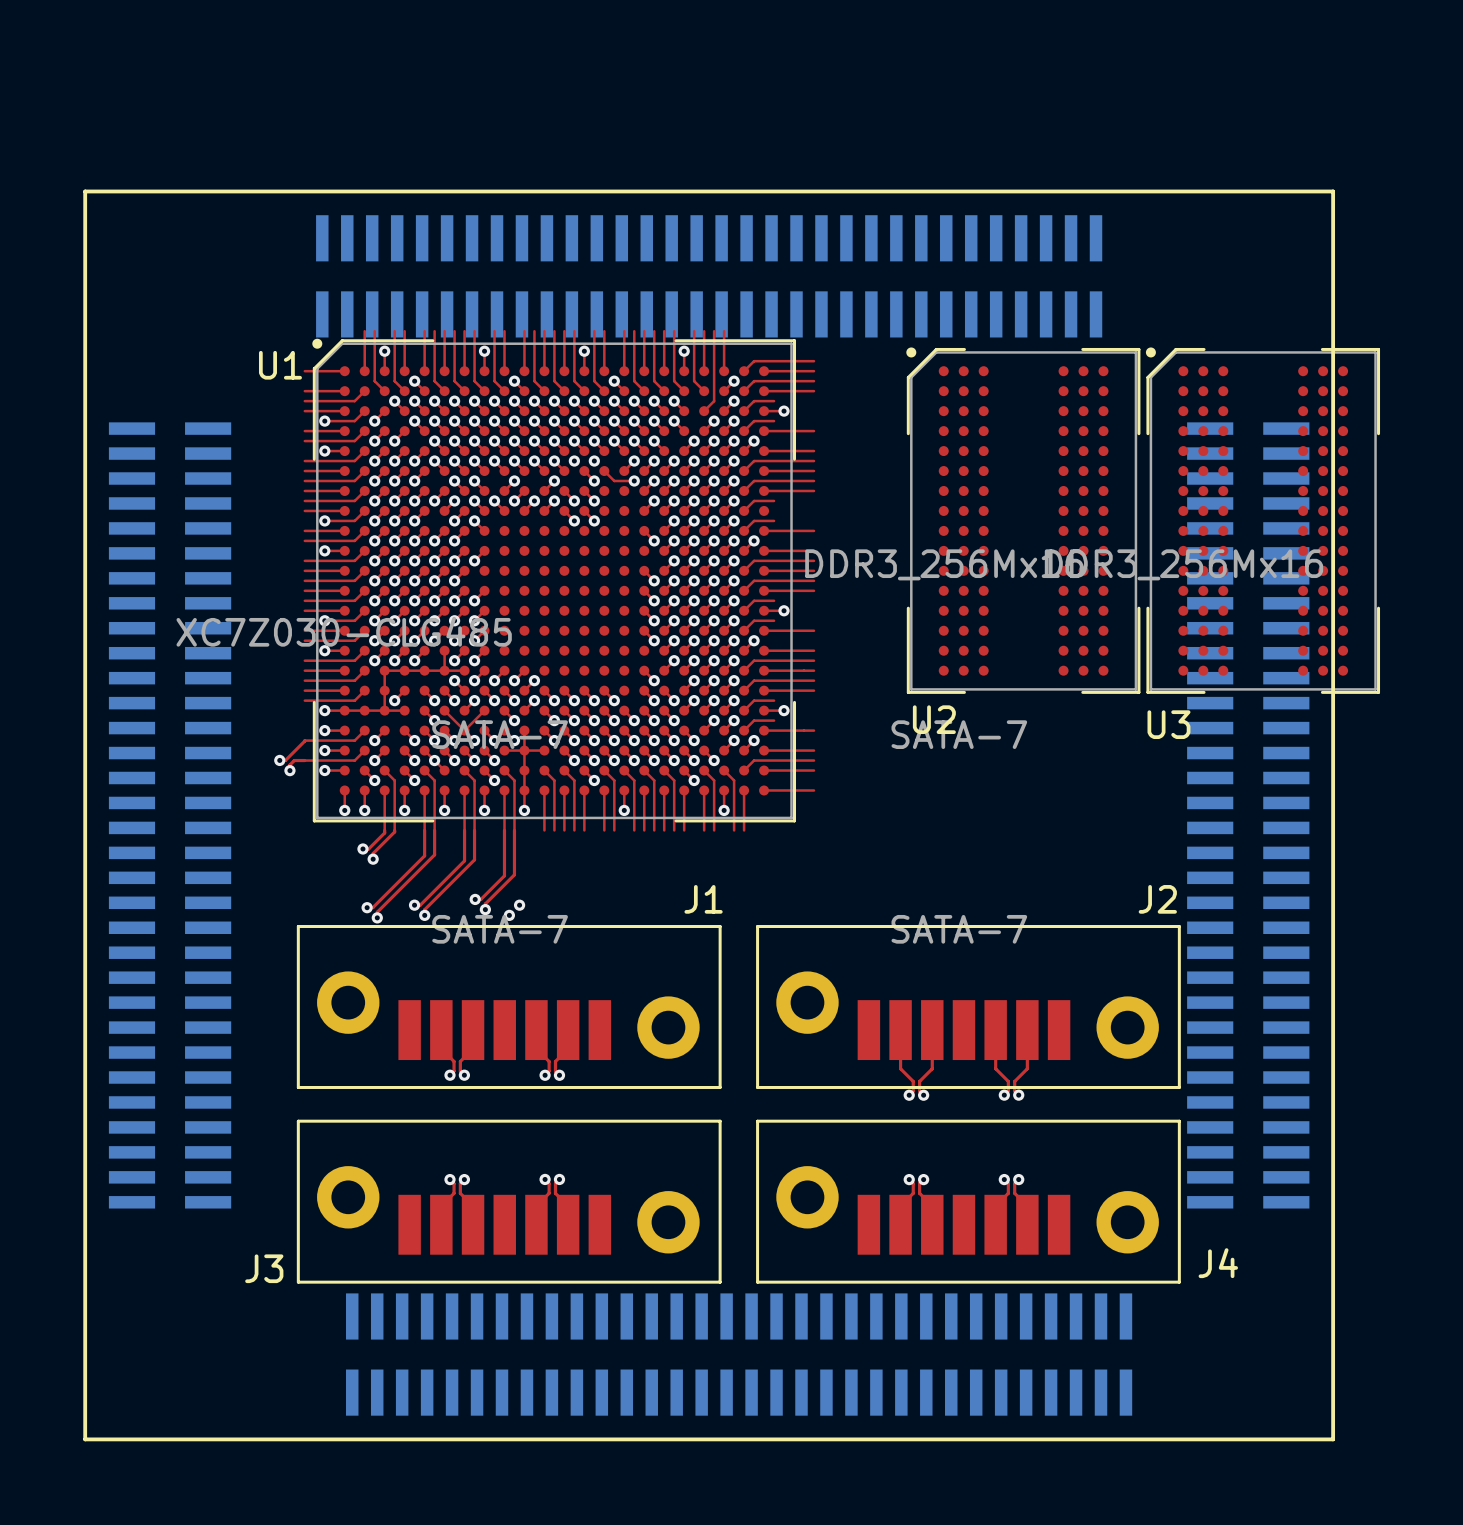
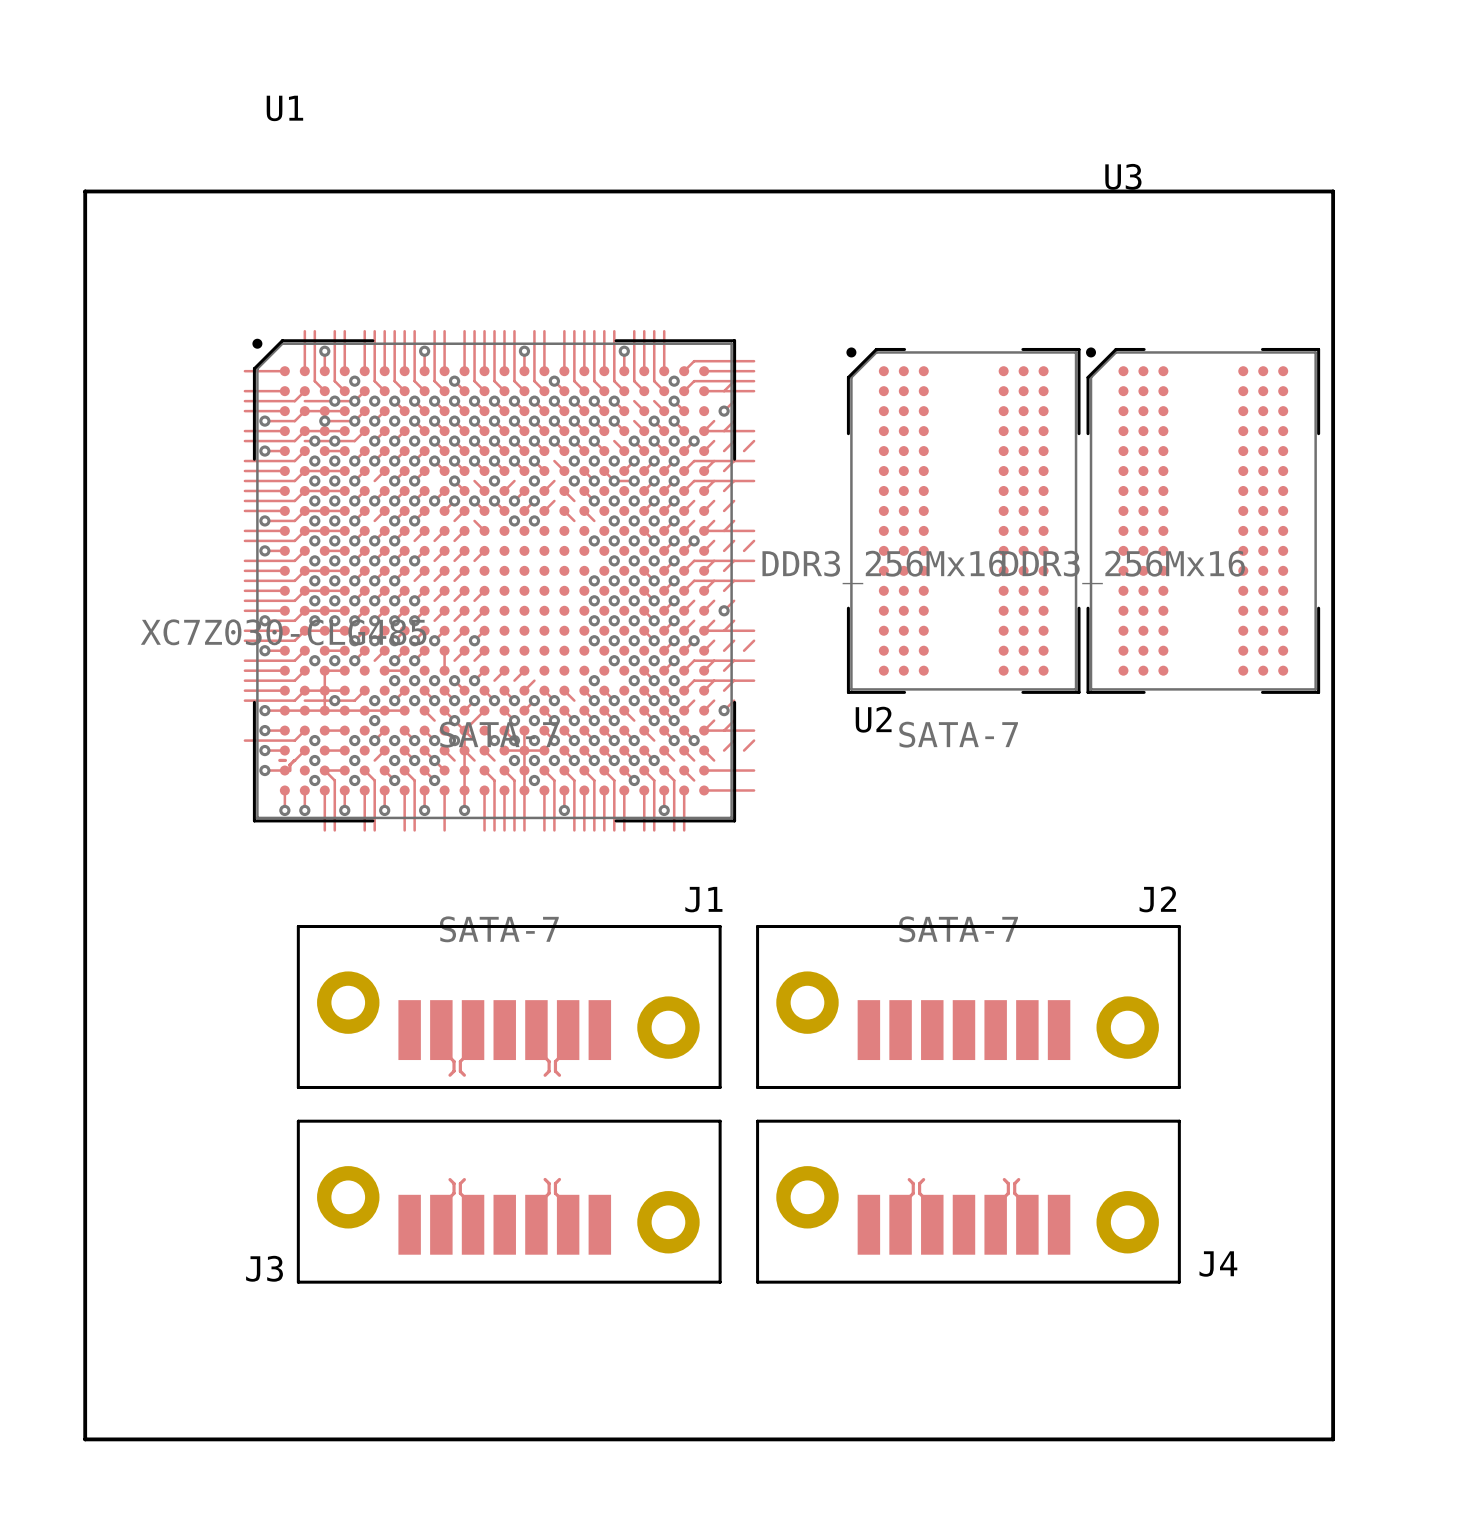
part: (709, 276) -> none
top track: none -> (314, 331) (314, 381) (324, 391)
top track: (424, 331) (424, 351) -> (384, 331) (384, 351)
top track: (454, 331) (454, 381) -> (414, 331) (414, 381)
top track: (524, 331) (524, 351) -> (484, 331) (484, 351)
top track: (554, 331) (554, 381) -> (514, 331) (514, 381)
top track: none -> (614, 331) (614, 381)
top track: (624, 331) (624, 351) -> (584, 331) (584, 351)
top track: (674, 331) (674, 381) (684, 391) -> (754, 381) (694, 381) (684, 391)
top track: (694, 331) (694, 381) (704, 391) -> (754, 391) (704, 391)
top track: (704, 331) (704, 371) -> (754, 371) (704, 371)
top track: (714, 331) (714, 401) (704, 411) -> none
top track: (724, 331) (724, 371) -> (344, 331) (344, 371)
top track: none -> (324, 351) (324, 371)
via: none -> (324, 351)
via: (384, 351) -> none
via: none -> (424, 351)
via: (484, 351) -> none
via: none -> (524, 351)
via: (584, 351) -> none
via: none -> (624, 351)
top track: (684, 351) (684, 371) -> (754, 361) (694, 361) (684, 371)
via: (684, 351) -> none
top track: (813, 361) (754, 361) (744, 371) -> none
U1 name position: U1 (280, 365) -> U1 (284, 108)
top track: none -> (244, 371) (284, 371)
top track: (304, 371) (344, 371) -> (304, 371) (304, 331)
top track: (764, 371) (813, 371) -> none
via: none -> (354, 381)
via: (414, 381) -> none
via: none -> (454, 381)
via: (514, 381) -> none
via: none -> (554, 381)
via: (614, 381) -> none
via: none -> (674, 381)
via: (734, 381) -> none
top track: (813, 381) (754, 381) (744, 391) -> none
top track: none -> (244, 391) (284, 391)
top track: (304, 391) (344, 391) -> (334, 331) (334, 381) (344, 391)
top track: none -> (304, 391) (294, 401) (244, 401)
top track: (764, 391) (813, 391) -> none
via: none -> (334, 401)
via: none -> (354, 401)
via: none -> (374, 401)
via: (634, 401) -> none
via: (654, 401) -> none
via: (734, 401) -> none
top track: (774, 401) (754, 401) (744, 411) -> none
top track: none -> (244, 411) (284, 411)
top track: none -> (304, 411) (294, 421) (264, 421)
via: none -> (724, 411)
top track: (764, 411) (784, 411) -> (264, 451) (284, 451)
via: (784, 411) -> none
via: none -> (264, 421)
via: none -> (354, 421)
via: none -> (394, 421)
via: (634, 421) -> none
via: (714, 421) -> none
via: (734, 421) -> none
top track: (774, 421) (754, 421) (744, 431) -> none
top track: none -> (244, 431) (284, 431)
top track: none -> (304, 431) (294, 441) (244, 441)
top track: (764, 431) (813, 431) -> (704, 431) (754, 431)
via: none -> (314, 441)
via: none -> (334, 441)
via: none -> (414, 441)
via: (614, 441) -> none
via: none -> (674, 441)
via: (714, 441) -> none
via: (734, 441) -> none
via: (754, 441) -> none
via: none -> (264, 451)
top track: none -> (304, 451) (294, 461) (244, 461)
via: (324, 451) -> none
top track: (764, 451) (813, 451) -> none
top track: (304, 461) (354, 461) -> none
via: none -> (314, 461)
via: none -> (334, 461)
via: none -> (354, 461)
via: (554, 461) -> none
via: none -> (614, 461)
top track: none -> (694, 461) (754, 461)
via: (694, 461) -> none
via: (714, 461) -> none
via: (734, 461) -> none
top track: (813, 461) (754, 461) (744, 471) -> none
top track: none -> (244, 471) (284, 471)
top track: none -> (304, 471) (294, 481) (244, 481)
top track: (764, 471) (813, 471) -> none
via: (474, 480) -> none
via: none -> (494, 480)
via: none -> (534, 480)
via: (554, 480) -> none
via: none -> (574, 480)
top track: (304, 481) (354, 481) -> none
via: none -> (314, 481)
via: none -> (334, 481)
via: none -> (354, 481)
via: (374, 481) -> none
via: (514, 481) -> none
via: none -> (614, 481)
top track: none -> (694, 481) (754, 481)
via: (694, 481) -> none
via: (714, 481) -> none
via: (734, 481) -> none
top track: (813, 481) (754, 481) (744, 490) -> none
top track: none -> (244, 490) (284, 490)
top track: none -> (304, 490) (294, 500) (244, 500)
top track: (764, 490) (813, 490) -> none
top track: (304, 500) (354, 500) -> none
via: none -> (314, 500)
via: none -> (334, 500)
via: none -> (354, 500)
via: (554, 500) -> none
via: (574, 500) -> none
via: none -> (614, 500)
via: none -> (634, 500)
via: (694, 500) -> none
via: (714, 500) -> none
via: (734, 500) -> none
top track: (774, 500) (754, 500) (744, 510) -> none
top track: none -> (244, 510) (284, 510)
top track: none -> (304, 510) (294, 520) (264, 520)
via: none -> (264, 520)
via: none -> (314, 520)
top track: (324, 520) (354, 520) -> none
via: (324, 520) -> none
via: none -> (334, 520)
via: none -> (354, 520)
via: (374, 520) -> none
via: (454, 520) -> none
via: (474, 520) -> none
via: none -> (514, 520)
via: none -> (534, 520)
via: (574, 520) -> none
via: (594, 520) -> none
via: none -> (614, 520)
via: none -> (634, 520)
via: none -> (654, 520)
via: (694, 520) -> none
via: (714, 520) -> none
via: (734, 520) -> none
top track: (774, 520) (754, 520) (744, 530) -> none
U2 position: (1023, 520) -> (963, 520)
U3 position: (1262, 520) -> (1203, 520)
top track: none -> (244, 530) (284, 530)
top track: none -> (304, 530) (294, 540) (244, 540)
top track: (764, 530) (813, 530) -> (704, 530) (754, 530)
top track: (304, 540) (354, 540) -> none
via: none -> (314, 540)
via: none -> (334, 540)
via: none -> (354, 540)
via: (414, 540) -> none
via: (434, 540) -> none
via: (454, 540) -> none
via: none -> (594, 540)
via: none -> (614, 540)
via: none -> (634, 540)
via: (714, 540) -> none
via: (734, 540) -> none
via: (754, 540) -> none
top track: none -> (264, 550) (284, 550)
via: none -> (264, 550)
top track: none -> (304, 550) (294, 560) (244, 560)
via: (324, 550) -> none
top track: (764, 550) (813, 550) -> none
top track: (304, 560) (354, 560) -> none
via: none -> (314, 560)
via: none -> (334, 560)
via: none -> (354, 560)
via: (434, 560) -> none
via: (454, 560) -> none
via: (474, 560) -> none
via: none -> (614, 560)
via: none -> (634, 560)
via: none -> (654, 560)
top track: none -> (694, 560) (754, 560)
via: (694, 560) -> none
via: (714, 560) -> none
via: (734, 560) -> none
top track: (813, 560) (754, 560) (744, 570) -> none
top track: none -> (244, 570) (284, 570)
top track: none -> (304, 570) (294, 580) (244, 580)
top track: (764, 570) (813, 570) -> none
top track: (304, 580) (354, 580) -> none
via: none -> (314, 580)
via: none -> (334, 580)
via: none -> (354, 580)
via: (414, 580) -> none
via: (434, 580) -> none
via: (454, 580) -> none
U1 position: (554, 580) -> (494, 580)
via: none -> (594, 580)
via: none -> (614, 580)
via: none -> (634, 580)
top track: none -> (694, 580) (754, 580)
via: (694, 580) -> none
via: (714, 580) -> none
via: (734, 580) -> none
top track: (813, 580) (754, 580) (744, 590) -> none
top track: none -> (244, 590) (284, 590)
top track: none -> (304, 590) (294, 600) (244, 600)
top track: (764, 590) (813, 590) -> none
top track: (304, 600) (354, 600) -> none
via: none -> (314, 600)
via: none -> (334, 600)
via: none -> (354, 600)
via: (434, 600) -> none
via: (454, 600) -> none
via: (474, 600) -> none
via: none -> (594, 600)
via: none -> (614, 600)
via: none -> (634, 600)
via: (694, 600) -> none
via: (714, 600) -> none
via: (734, 600) -> none
top track: (774, 600) (754, 600) (744, 610) -> none
top track: none -> (244, 610) (284, 610)
top track: none -> (304, 610) (294, 620) (264, 620)
via: none -> (724, 610)
top track: (764, 610) (784, 610) -> (264, 650) (284, 650)
via: (784, 610) -> none
via: none -> (264, 620)
via: none -> (314, 620)
top track: (324, 620) (354, 620) -> none
via: (324, 620) -> none
via: none -> (334, 620)
via: none -> (354, 620)
via: (434, 620) -> none
via: (454, 620) -> none
via: (474, 620) -> none
via: none -> (594, 620)
via: none -> (614, 620)
via: none -> (634, 620)
via: (694, 620) -> none
via: (714, 620) -> none
via: (734, 620) -> none
top track: (774, 620) (754, 620) (744, 630) -> none
top track: none -> (244, 630) (284, 630)
top track: none -> (304, 630) (294, 640) (244, 640)
top track: (764, 630) (813, 630) -> (704, 630) (754, 630)
top track: (304, 640) (354, 640) -> none
via: none -> (354, 640)
via: (454, 640) -> none
via: none -> (594, 640)
via: none -> (614, 640)
via: none -> (634, 640)
via: (714, 640) -> none
via: (734, 640) -> none
via: (754, 640) -> none
via: none -> (264, 650)
top track: none -> (304, 650) (294, 660) (244, 660)
via: (324, 650) -> none
top track: (764, 650) (813, 650) -> none
top track: (304, 660) (354, 660) -> none
via: none -> (314, 660)
via: none -> (334, 660)
via: none -> (354, 660)
via: (374, 660) -> none
via: (454, 660) -> none
via: (474, 660) -> none
via: none -> (614, 660)
via: none -> (634, 660)
via: none -> (654, 660)
via: (694, 660) -> none
via: (714, 660) -> none
via: (734, 660) -> none
top track: (813, 660) (754, 660) (744, 670) -> none
top track: none -> (244, 670) (284, 670)
top track: (304, 670) (324, 670) -> (264, 710) (324, 710) (324, 670)
top track: (364, 670) (354, 680) (304, 680) -> (304, 670) (294, 680) (244, 680)
top track: (384, 670) (384, 710) -> (324, 790) (324, 830)
top track: (404, 670) (464, 670) -> (694, 660) (754, 660)
top track: (764, 670) (813, 670) -> none
via: none -> (394, 680)
via: none -> (414, 680)
via: none -> (434, 680)
via: (494, 680) -> none
via: (514, 680) -> none
via: (534, 680) -> none
via: none -> (594, 680)
via: none -> (634, 680)
via: none -> (674, 680)
top track: none -> (694, 680) (754, 680)
via: (694, 680) -> none
via: (714, 680) -> none
via: (734, 680) -> none
top track: (813, 680) (754, 680) (744, 690) -> none
top track: none -> (244, 690) (284, 690)
top track: none -> (304, 690) (294, 700) (244, 700)
top track: (764, 690) (813, 690) -> none
via: none -> (374, 700)
via: none -> (414, 700)
via: (574, 700) -> none
via: none -> (634, 700)
via: (694, 700) -> none
via: (714, 700) -> none
via: (734, 700) -> none
top track: (774, 700) (754, 700) (744, 710) -> none
via: none -> (264, 710)
via position: (324, 710) -> (334, 700)
via: none -> (724, 710)
top track: (764, 710) (784, 710) -> (264, 750) (284, 750)
via: (784, 710) -> none
via: none -> (374, 720)
via: (434, 720) -> none
via: none -> (454, 720)
via: none -> (534, 720)
via: (634, 720) -> none
via: (714, 720) -> none
via: (734, 720) -> none
top track: (774, 720) (754, 720) (744, 730) -> none
U3 name position: U3 (1168, 724) -> U3 (1123, 176)
top track: none -> (264, 730) (284, 730)
via: none -> (264, 730)
top track: none -> (304, 730) (294, 740) (244, 740)
via: (324, 730) -> none
top track: (364, 730) (354, 740) (304, 740) (285, 760) -> none
top track: none -> (464, 730) (464, 790)
top track: (764, 730) (813, 730) -> (704, 730) (754, 730)
via: none -> (314, 740)
via: none -> (354, 740)
via: none -> (394, 740)
via: (474, 740) -> none
via: none -> (534, 740)
via: (654, 740) -> none
via: (734, 740) -> none
via: (754, 740) -> none
via: none -> (264, 750)
via: (324, 750) -> none
top track: (364, 750) (354, 760) (294, 760) -> (304, 750) (294, 760)
top track: (764, 750) (813, 750) -> none
via: (279, 760) -> none
via: none -> (314, 760)
via: none -> (354, 760)
via: (374, 760) -> none
via: none -> (394, 760)
via: (454, 760) -> none
via: (474, 760) -> none
via: (494, 760) -> none
via: none -> (514, 760)
via: none -> (534, 760)
via: none -> (554, 760)
via: (674, 760) -> none
via: (694, 760) -> none
via: (714, 760) -> none
top track: (813, 760) (754, 760) (744, 770) -> none
top track: none -> (264, 770) (284, 770)
via: none -> (264, 770)
via: (289, 770) -> none
via: (324, 770) -> none
top track: (464, 770) (474, 780) (474, 859) (424, 909) (424, 915) -> none
top track: (704, 770) (714, 780) (714, 830) -> (704, 770) (754, 770)
top track: (724, 770) (734, 780) (734, 830) -> (324, 770) (334, 780) (334, 830)
top track: (764, 770) (813, 770) -> none
via: none -> (314, 780)
via: none -> (354, 780)
top track: none -> (374, 780) (374, 830)
via: (374, 780) -> none
top track: (394, 780) (394, 831) (373, 853) (373, 859) -> none
via: none -> (394, 780)
top track: none -> (414, 780) (414, 830)
via: (414, 780) -> none
top track: (434, 780) (434, 854) (377, 912) (377, 917) -> none
via: none -> (434, 780)
top track: none -> (494, 780) (494, 830)
via: (494, 780) -> none
via: none -> (534, 780)
via: (594, 780) -> none
top track: (634, 780) (634, 830) -> (594, 780) (594, 830)
via: none -> (634, 780)
via: (694, 780) -> none
top track: none -> (284, 790) (284, 810)
top track: (704, 790) (704, 830) -> (704, 790) (754, 790)
top track: (724, 790) (724, 810) -> (304, 790) (304, 810)
top track: (744, 790) (744, 830) -> none
top track: (764, 790) (813, 790) -> none
via: none -> (284, 810)
via: none -> (304, 810)
top track: none -> (364, 810) (364, 830)
via: (364, 810) -> none
top track: (384, 810) (384, 832) (368, 848) (362, 848) -> none
via: none -> (384, 810)
top track: none -> (404, 810) (404, 830)
via: (404, 810) -> none
top track: (424, 810) (424, 855) (372, 907) (367, 907) -> none
via: none -> (424, 810)
top track: none -> (444, 810) (444, 830)
via: (444, 810) -> none
top track: (464, 810) (464, 860) (420, 905) (414, 905) -> none
via: none -> (464, 810)
top track: none -> (484, 810) (484, 830)
via: (484, 810) -> none
via: (524, 810) -> none
top track: (564, 810) (564, 830) -> (524, 810) (524, 830)
via: none -> (564, 810)
via: (624, 810) -> none
top track: (664, 810) (664, 830) -> (624, 810) (624, 830)
via: none -> (664, 810)
via: (724, 810) -> none
part: (170, 815) -> none
part: (1248, 815) -> none
top track: (504, 830) (504, 875) (480, 899) (475, 899) -> none
top track: (514, 830) (514, 874) (485, 903) (485, 909) -> none
via: (362, 848) -> none
via: (373, 859) -> none
via: (475, 899) -> none
via: (414, 905) -> none
via: (519, 905) -> none
via: (367, 907) -> none
via: (485, 909) -> none
via: (424, 915) -> none
via: (509, 915) -> none
via: (377, 917) -> none
top track: (900, 1050) (900, 1068) (913, 1081) (913, 1091) (909, 1095) -> none
top track: (932, 1050) (932, 1068) (919, 1081) (919, 1091) (923, 1095) -> none
top track: (995, 1050) (995, 1068) (1008, 1081) (1008, 1091) (1004, 1095) -> none
top track: (1027, 1050) (1027, 1068) (1014, 1081) (1014, 1091) (1018, 1095) -> none
via: (449, 1075) -> none
via: (464, 1075) -> none
via: (545, 1075) -> none
via: (559, 1075) -> none
via: (909, 1095) -> none
via: (923, 1095) -> none
via: (1004, 1095) -> none
via: (1018, 1095) -> none
via: (449, 1179) -> none
via: (464, 1179) -> none
via: (545, 1179) -> none
via: (559, 1179) -> none
via: (909, 1179) -> none
via: (923, 1179) -> none
via: (1004, 1179) -> none
via: (1018, 1179) -> none
part: (739, 1354) -> none

